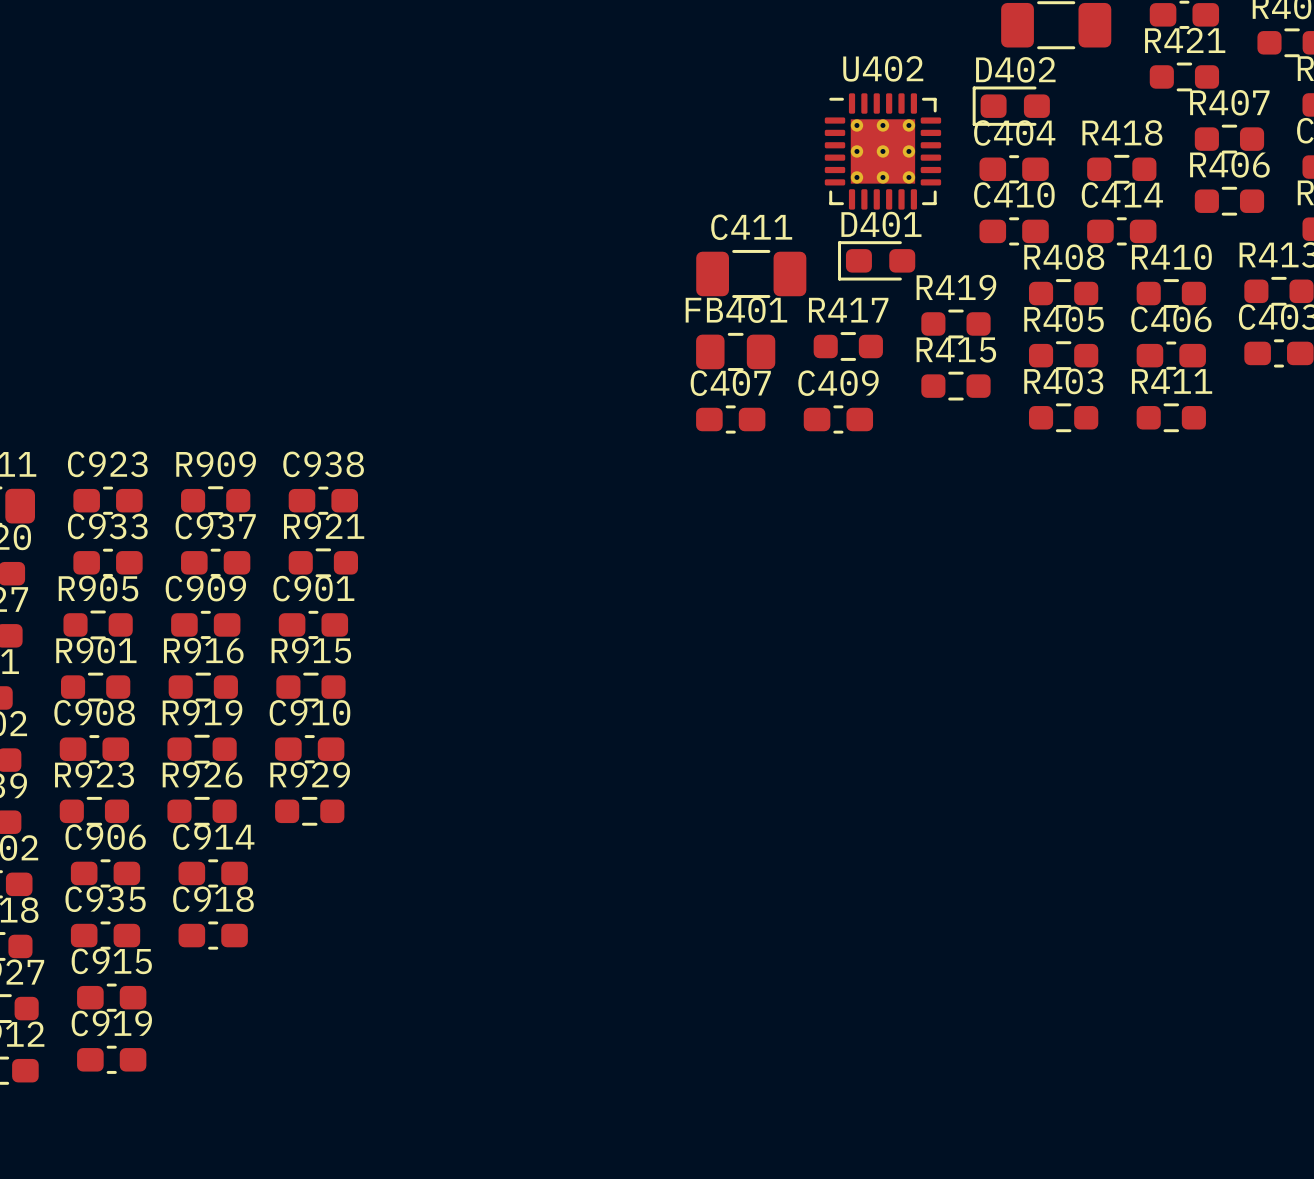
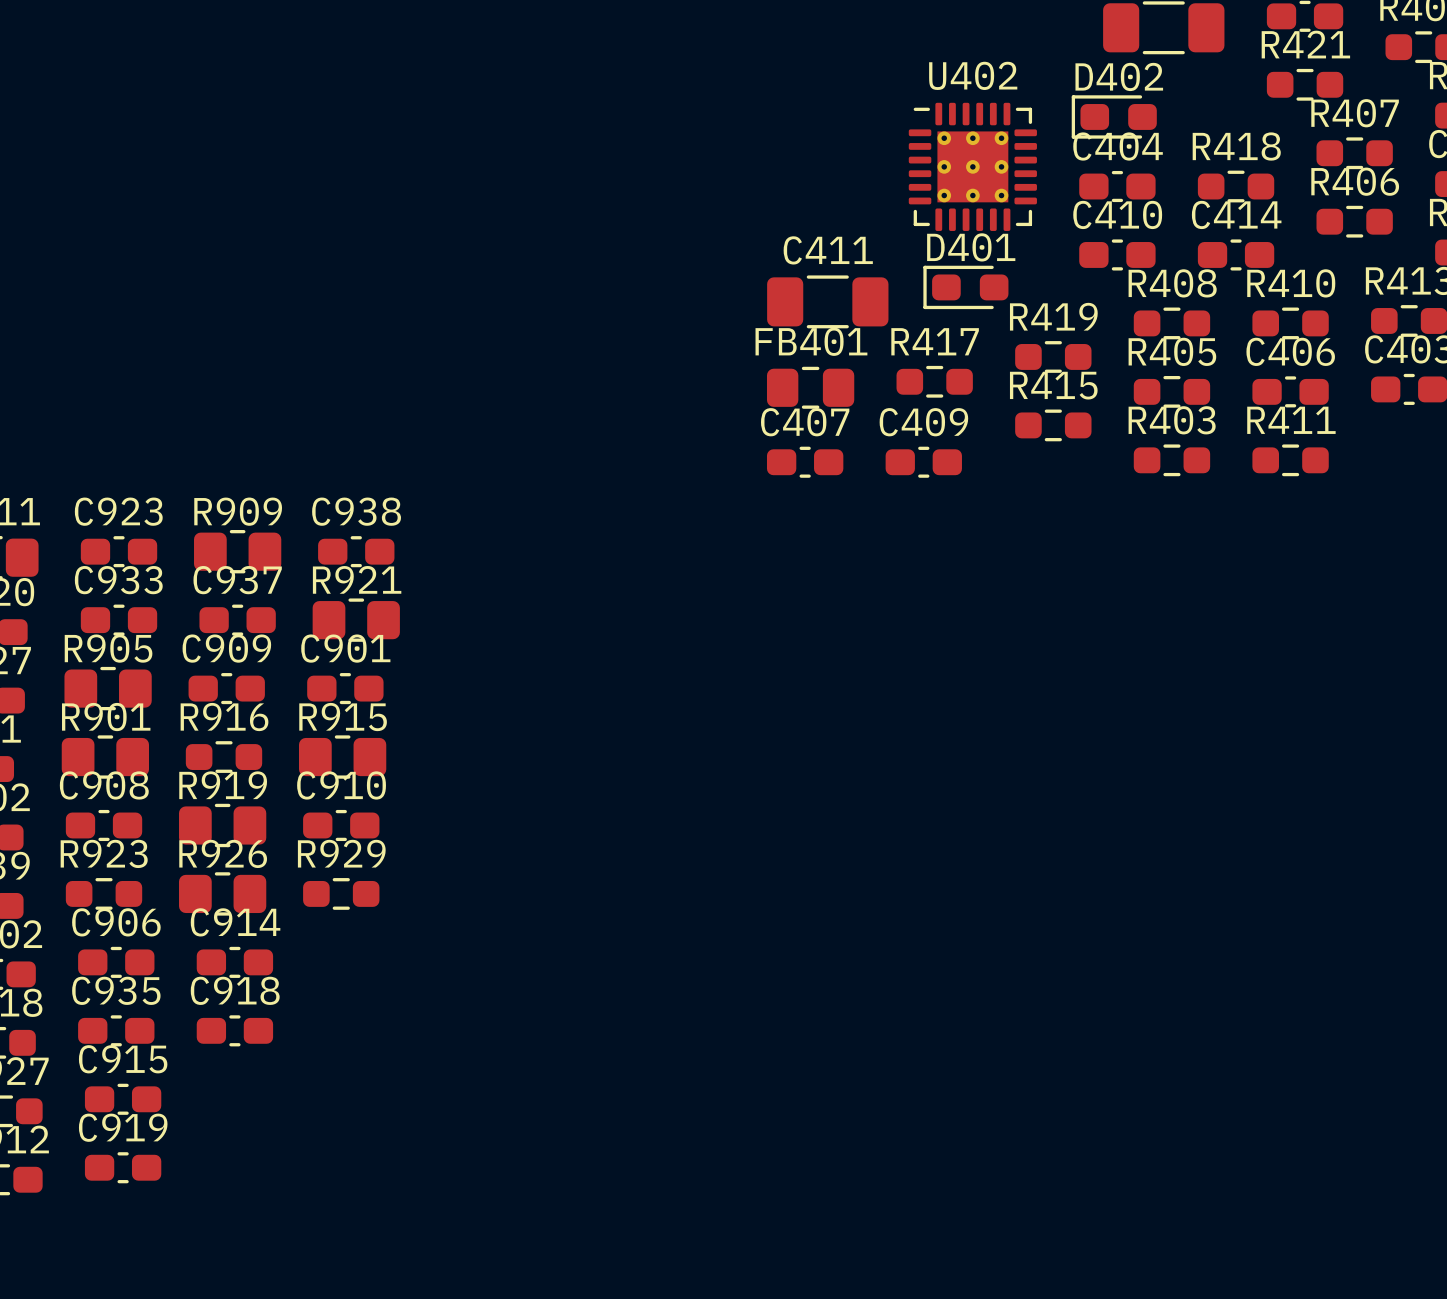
R909 footprint: [181, 486, 251, 516] -> [194, 530, 282, 574]
R921 footprint: [288, 548, 358, 578] -> [312, 598, 400, 642]
R905 footprint: [63, 610, 133, 640] -> [64, 666, 152, 711]
R901 footprint: [60, 672, 131, 702] -> [61, 735, 150, 779]
R915 footprint: [276, 672, 346, 702] -> [299, 735, 387, 779]
R919 footprint: [167, 734, 237, 764] -> [179, 803, 267, 848]
R926 footprint: [167, 796, 237, 826] -> [179, 872, 267, 916]

